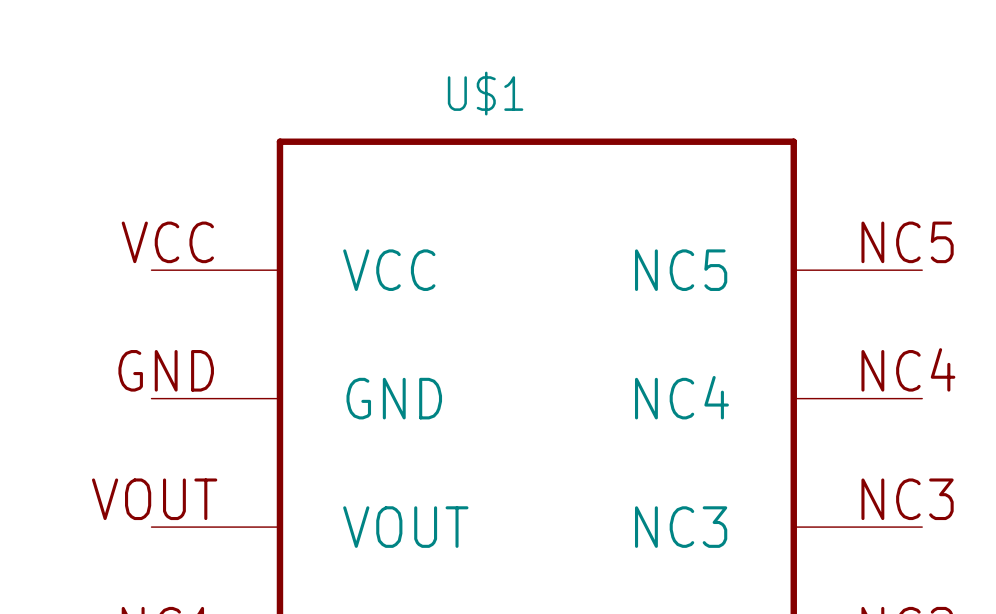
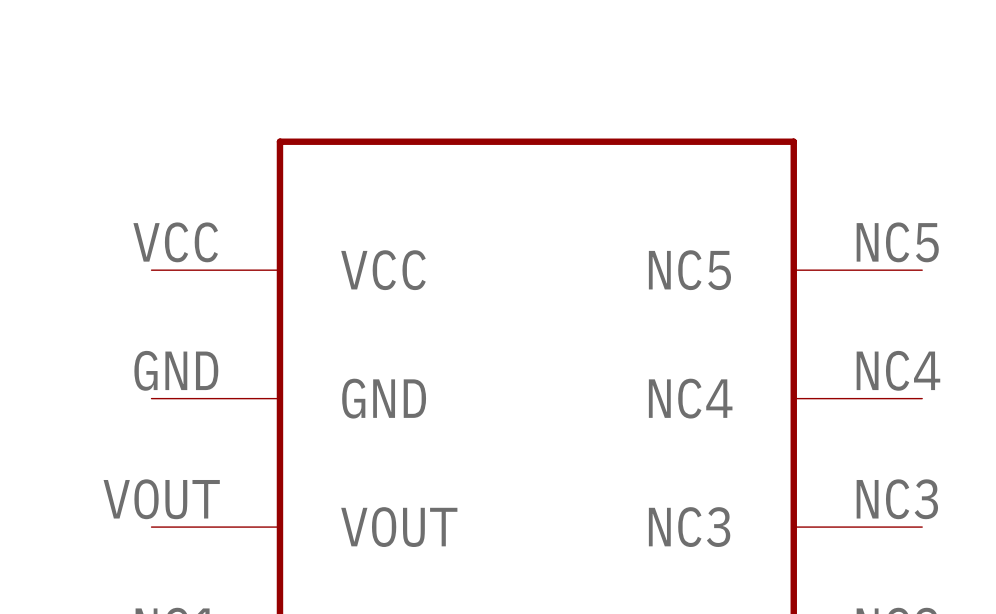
U$1 name: U$1 (485, 93) -> none

